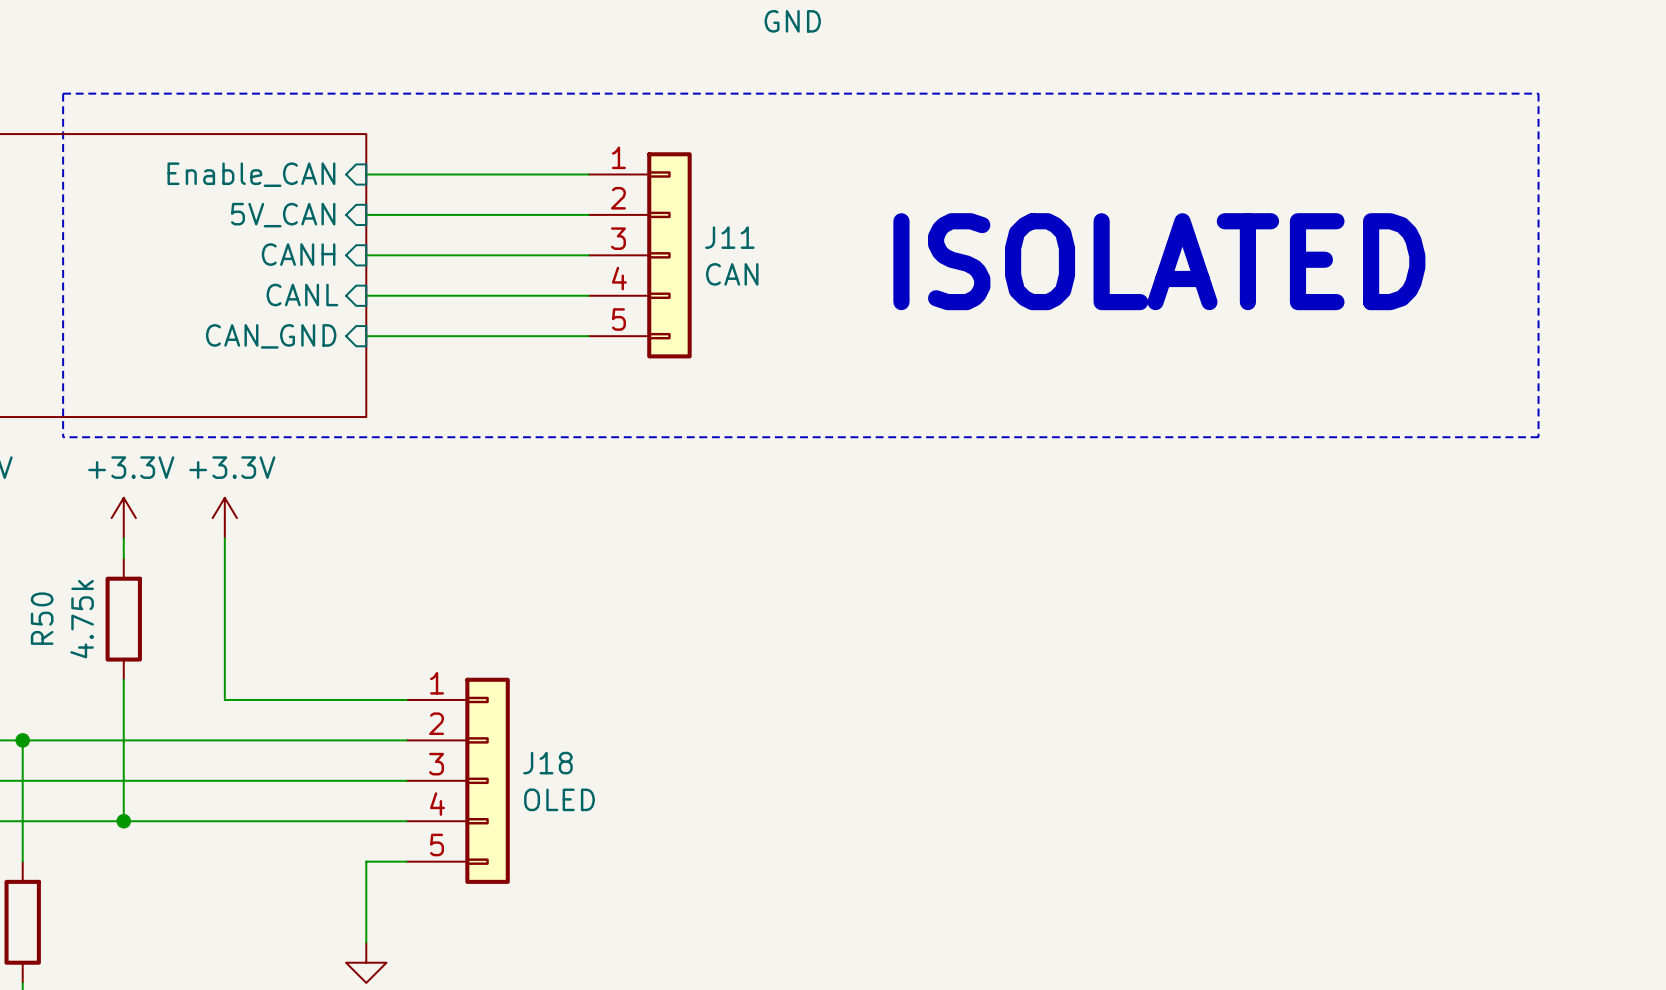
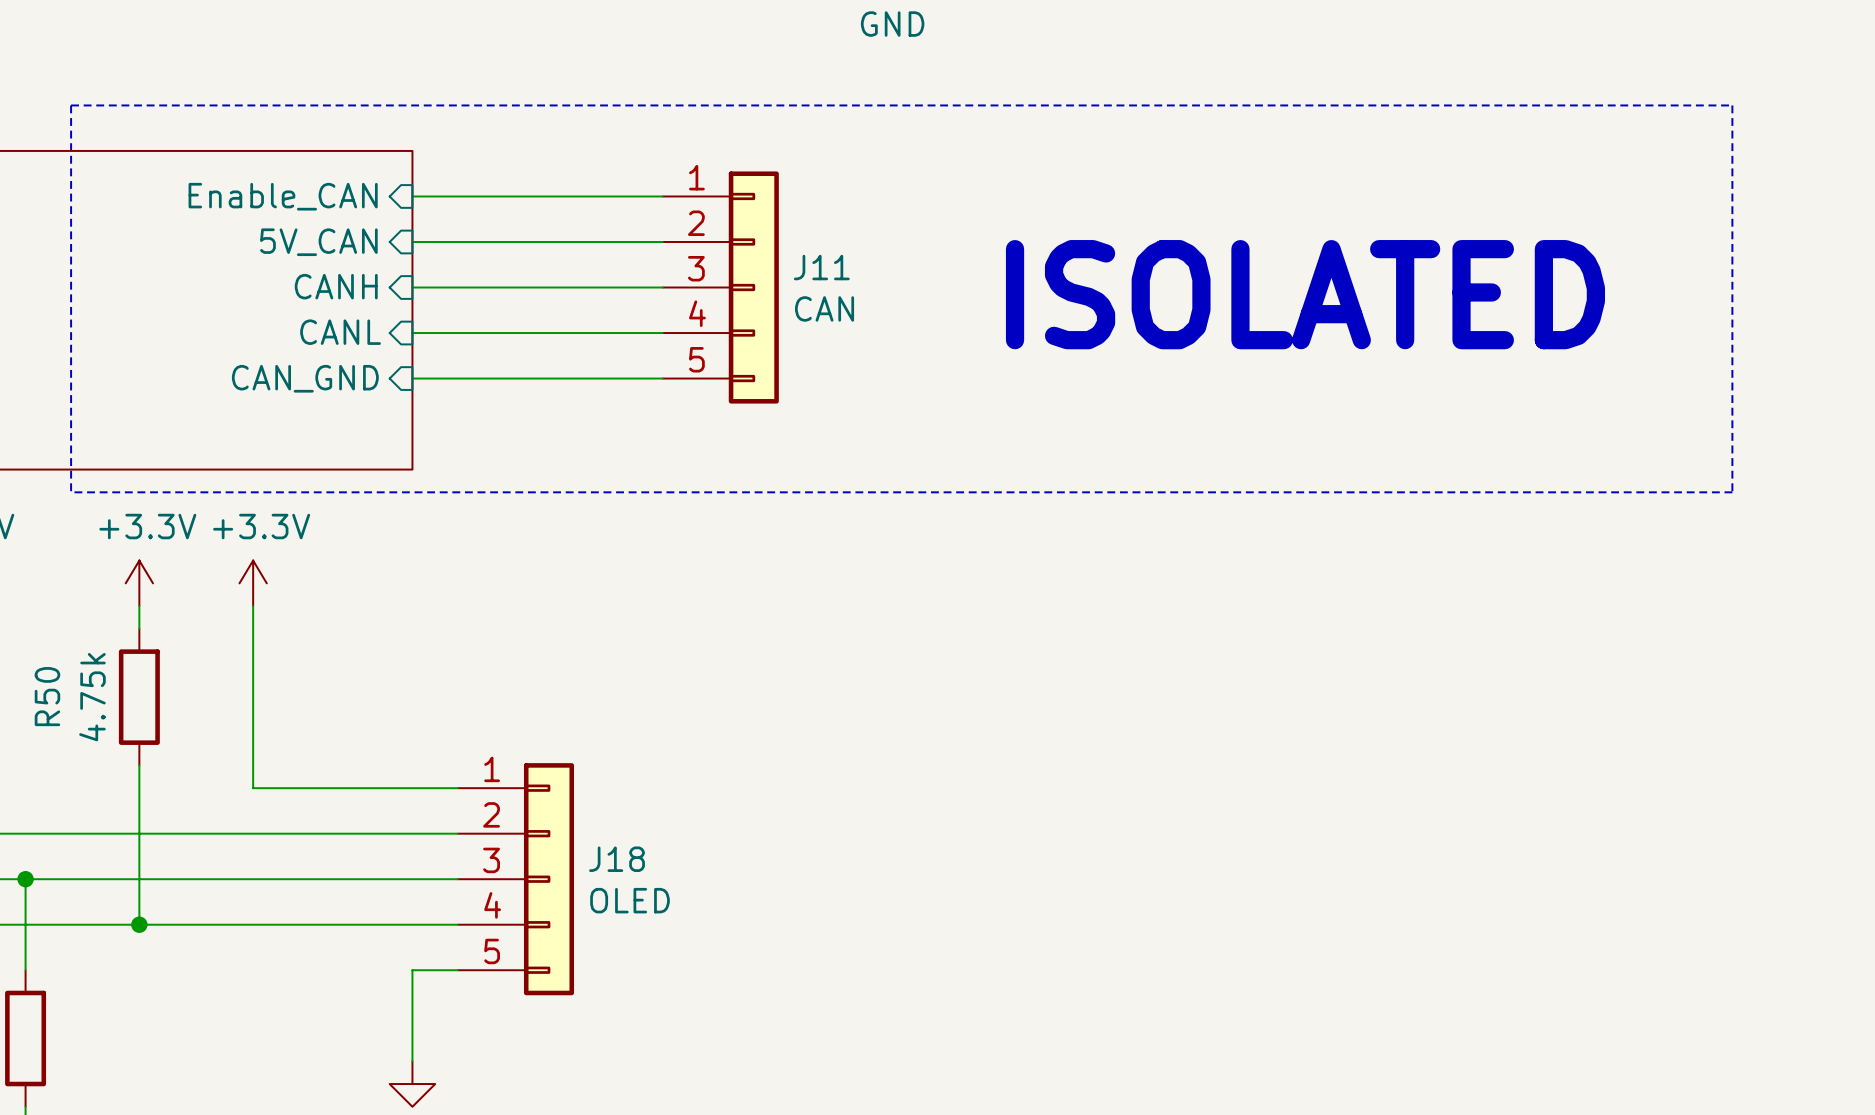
wire: (22, 740) (22, 780) -> none
junction position: (22, 740) -> (25, 879)

